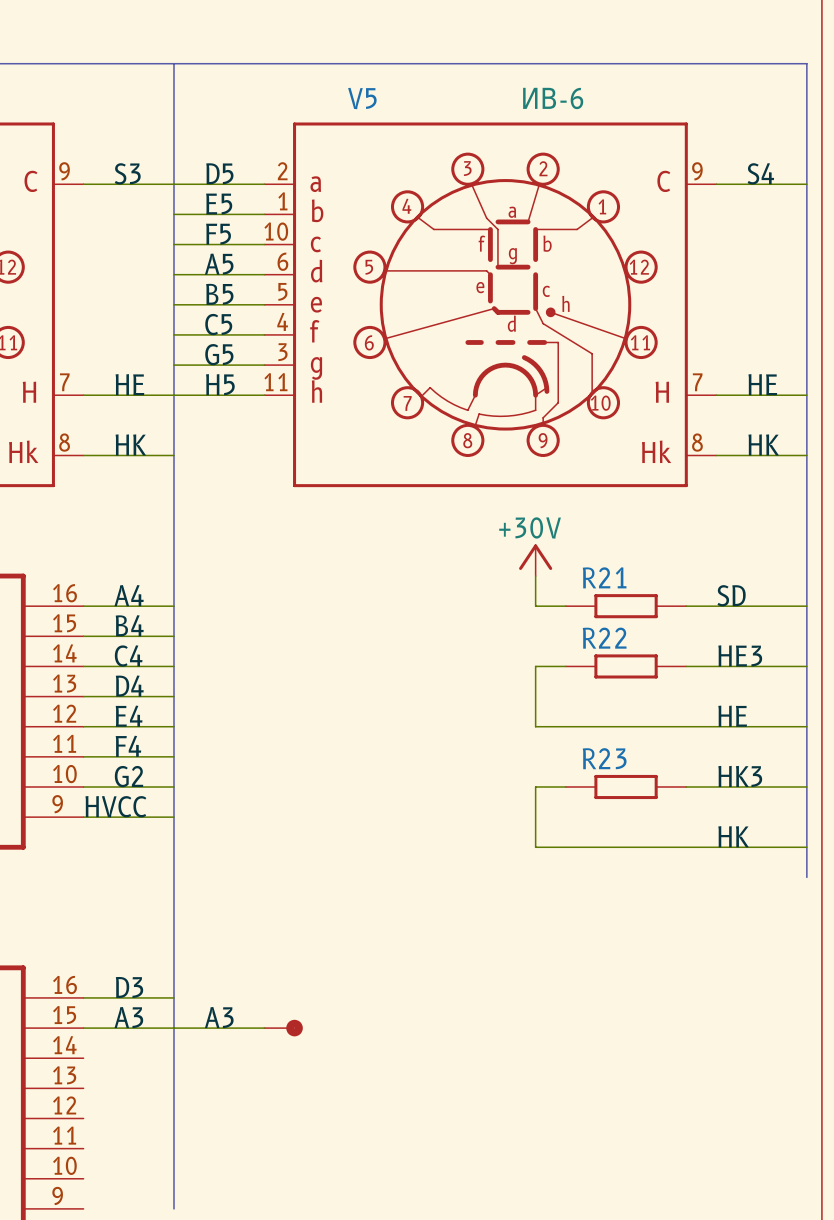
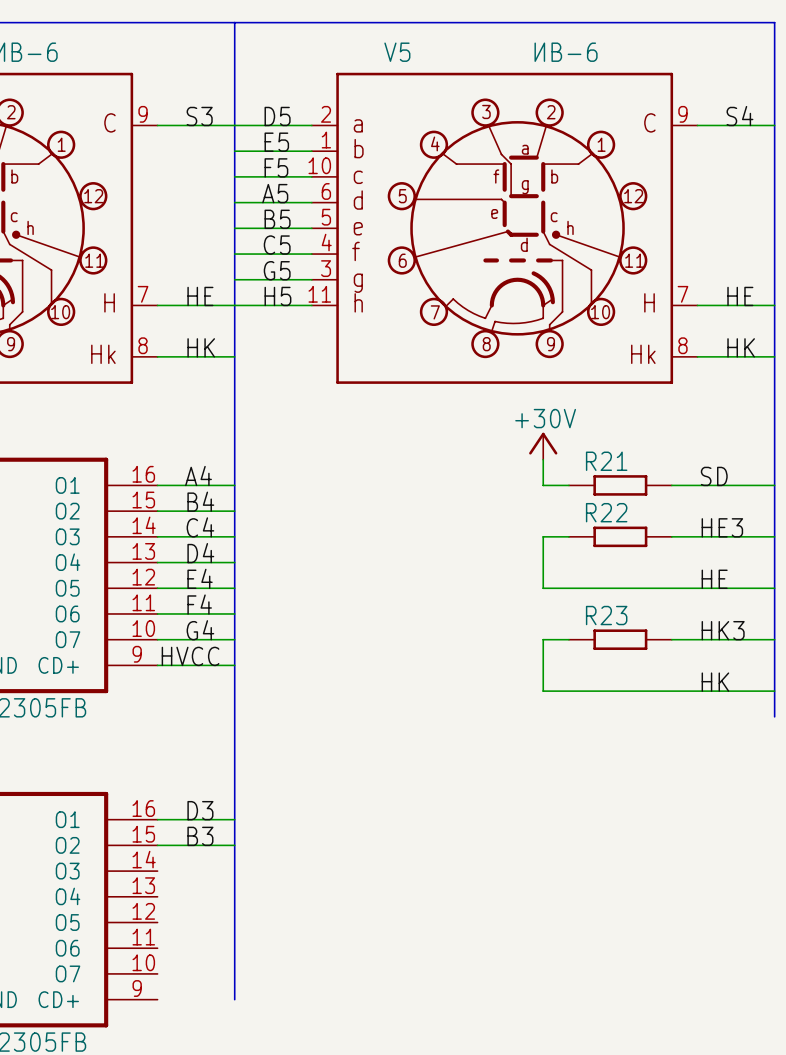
label: G2 (128, 776) -> G4 (200, 630)
label: A3 (128, 1017) -> B3 (200, 836)
label: A3 (219, 1017) -> none
wire: (173, 1028) (264, 1028) -> none
part: (283, 1028) -> none

